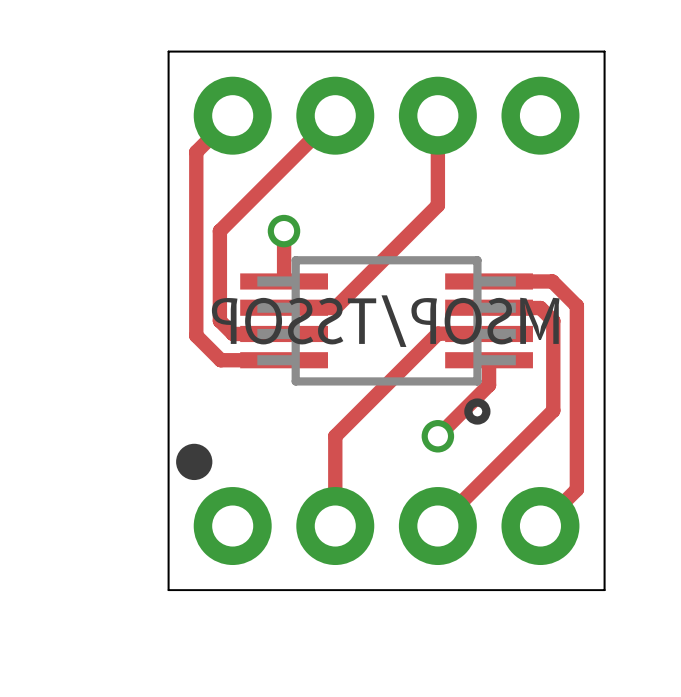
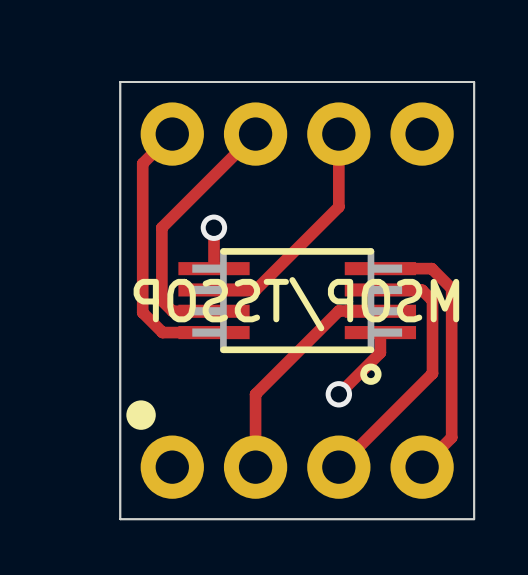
part footprint: [240, 256, 533, 425] -> [178, 248, 417, 385]

